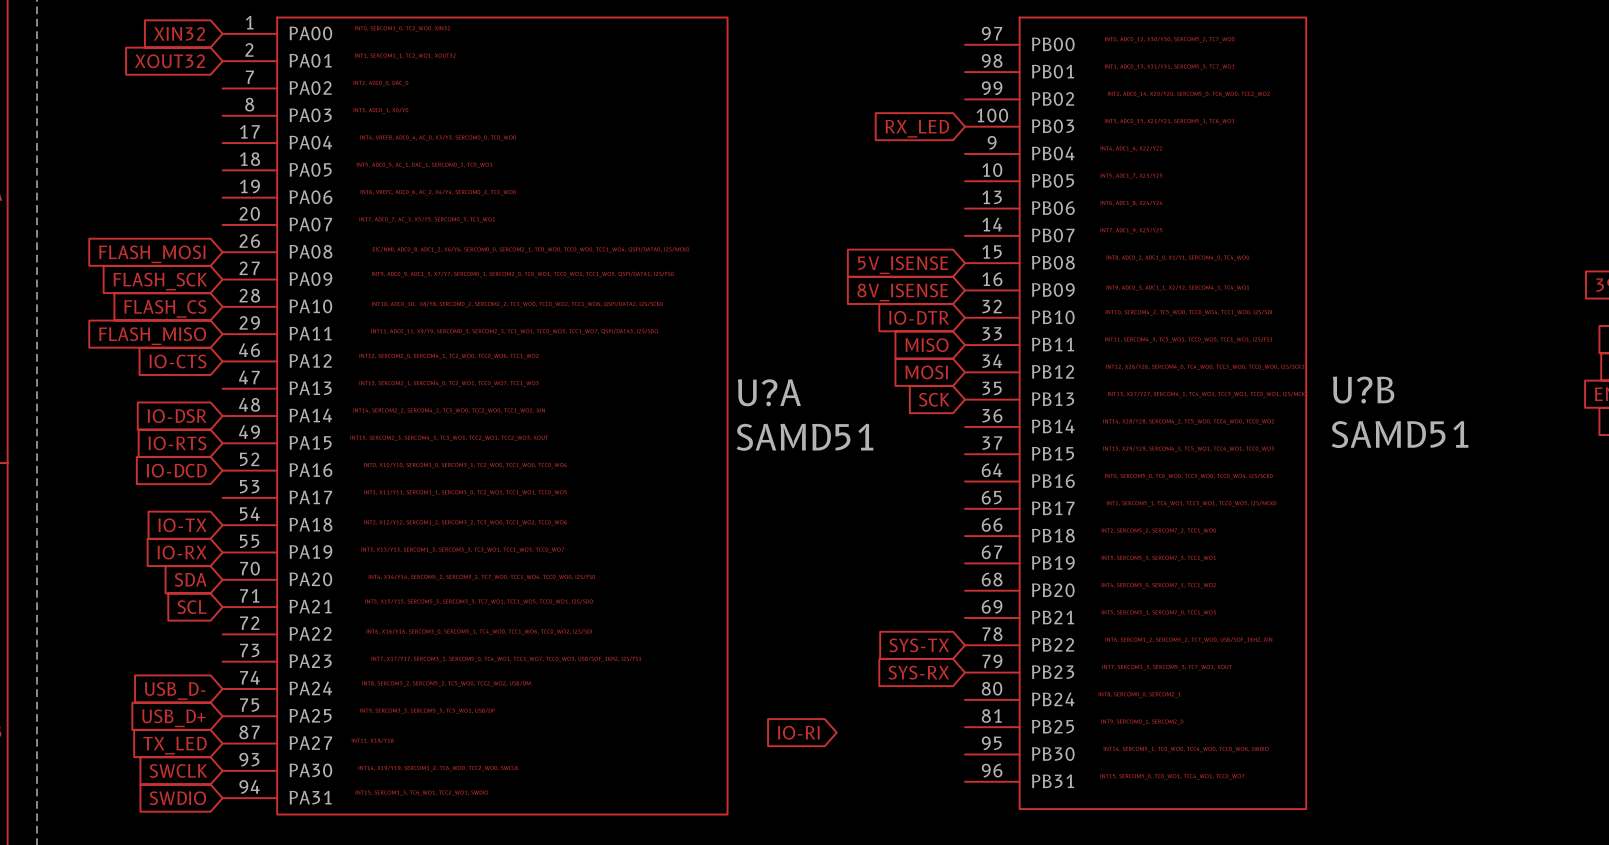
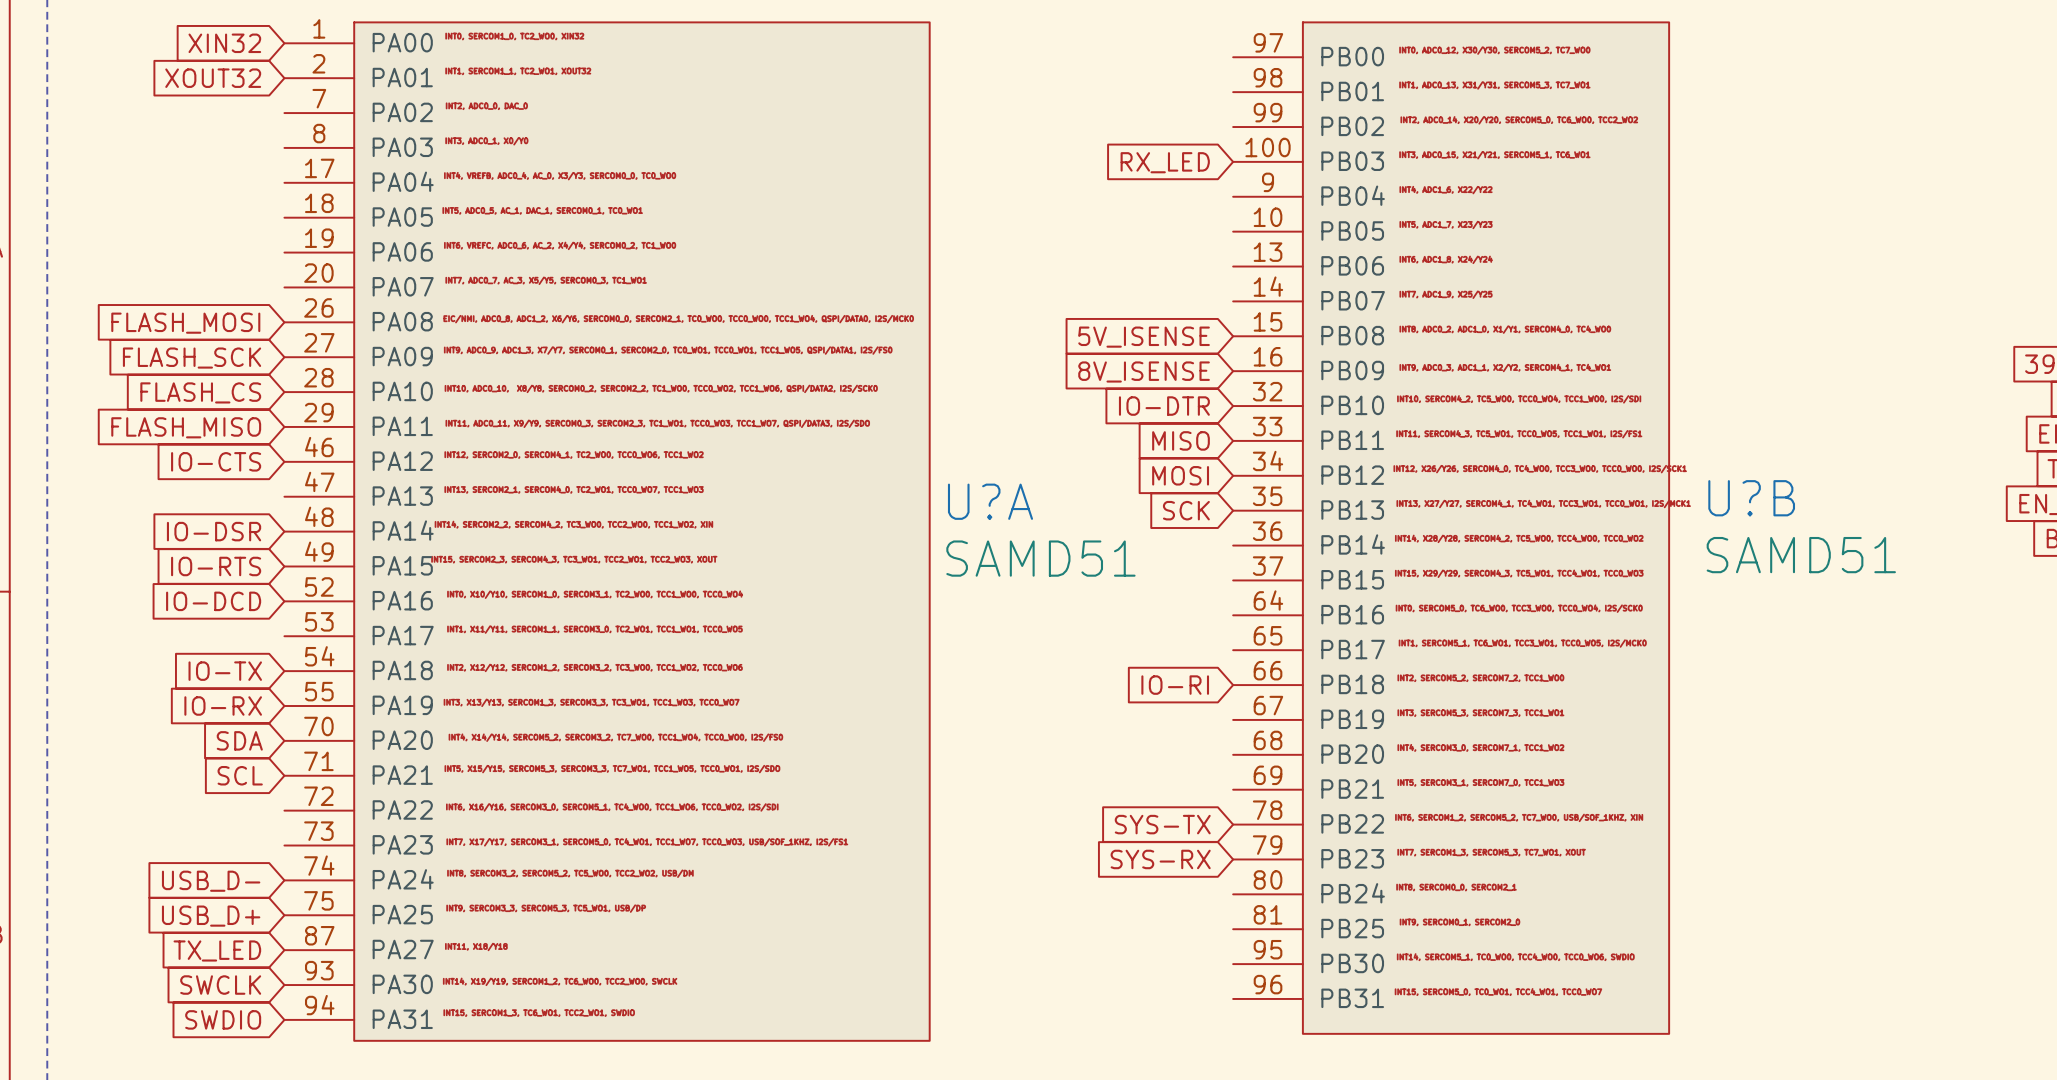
global label position: IO-RI (798, 732) -> IO-RI (1175, 685)

